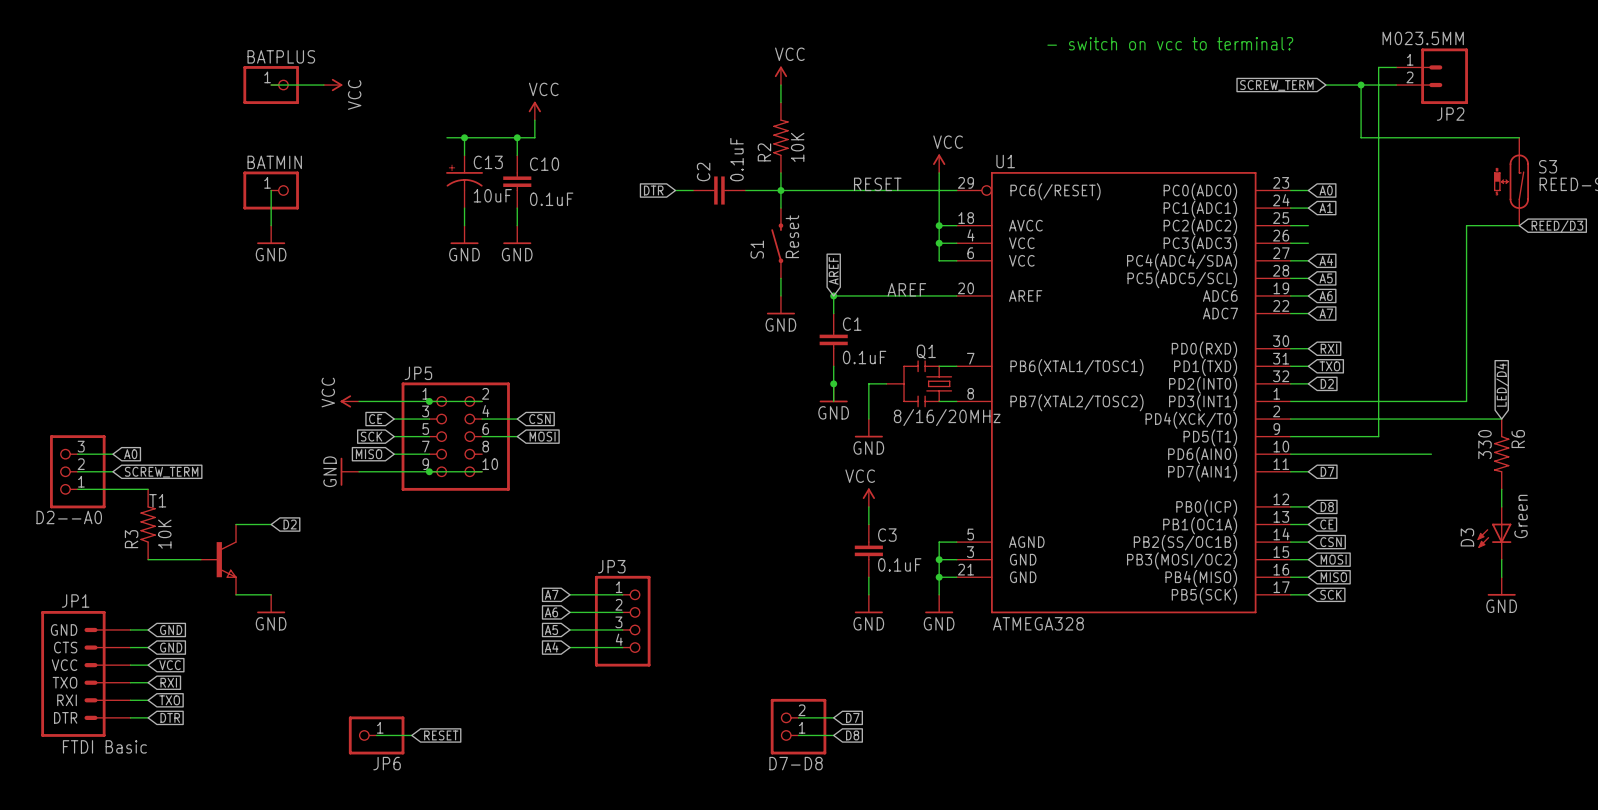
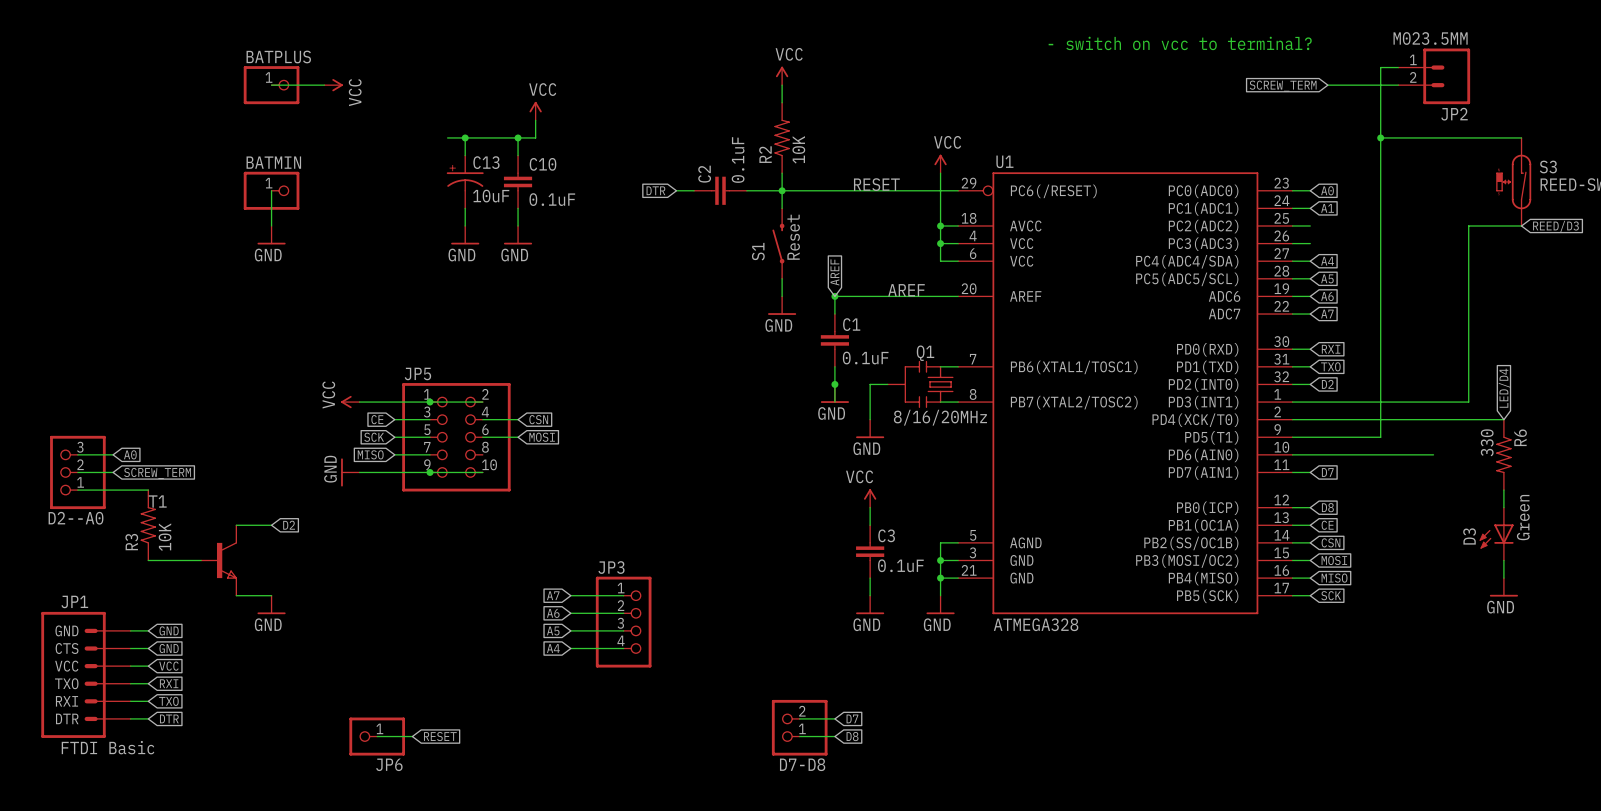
wire: (1361, 85) (1361, 137) (1378, 137) -> none
junction: (1361, 85) -> none
junction: none -> (1380, 137)

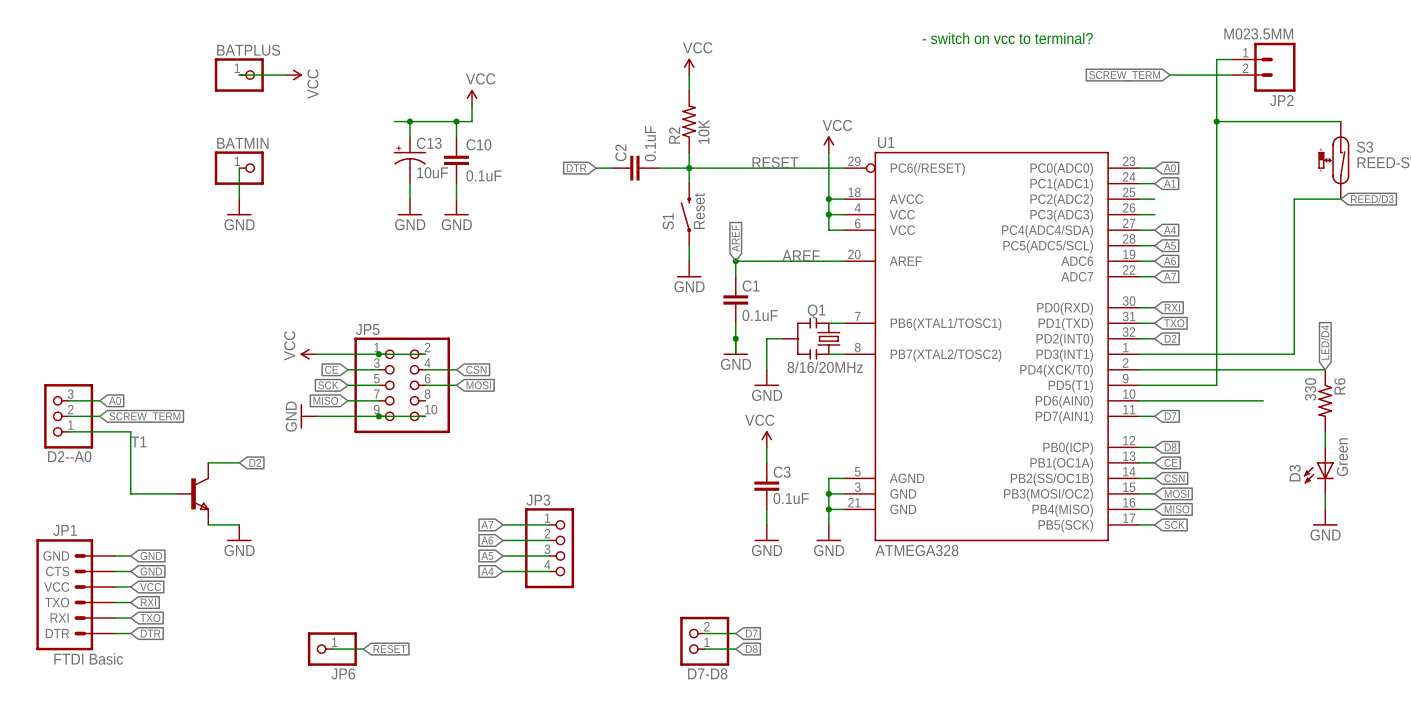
R3: 10K (148, 525) -> none

